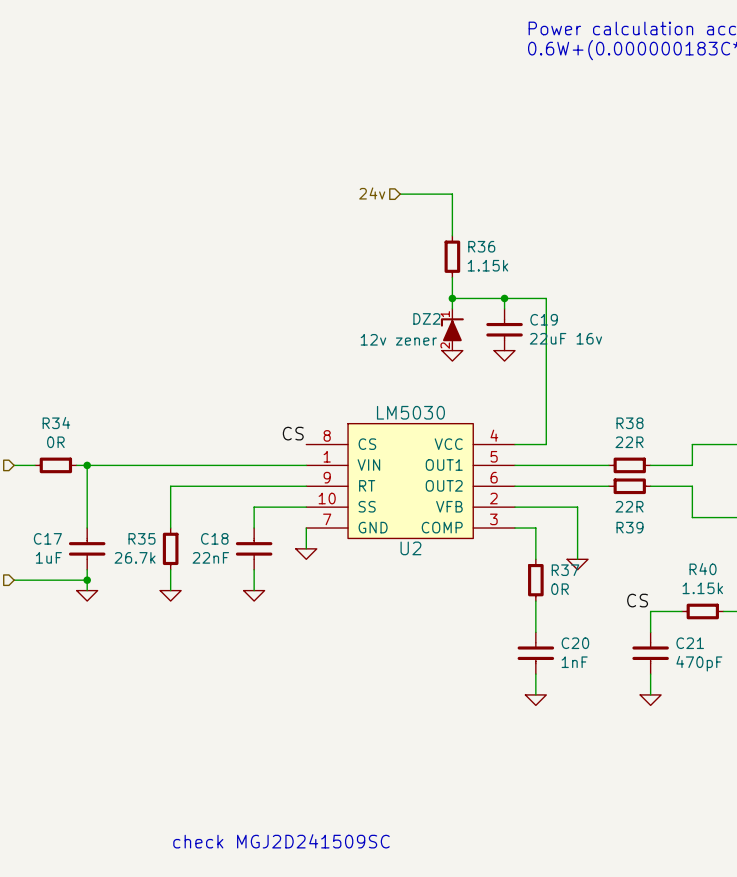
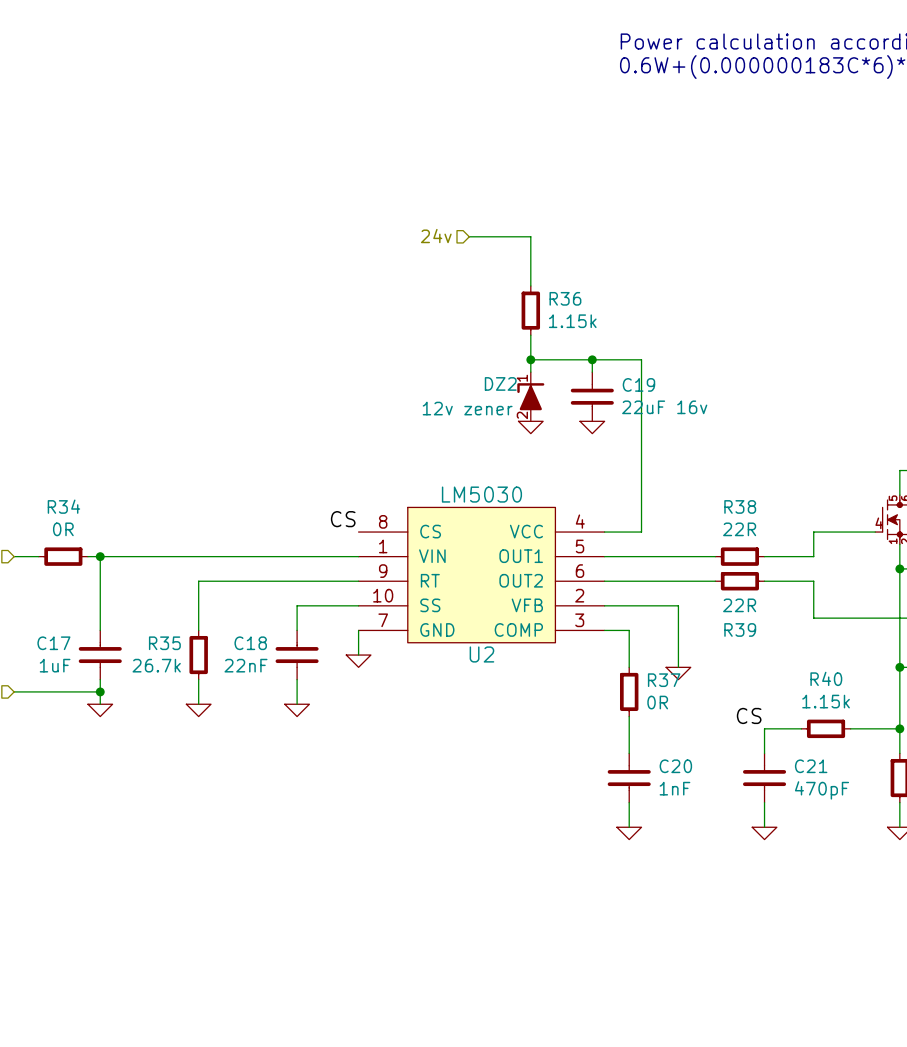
text: check MGJ2D241509SC (281, 841) -> none

